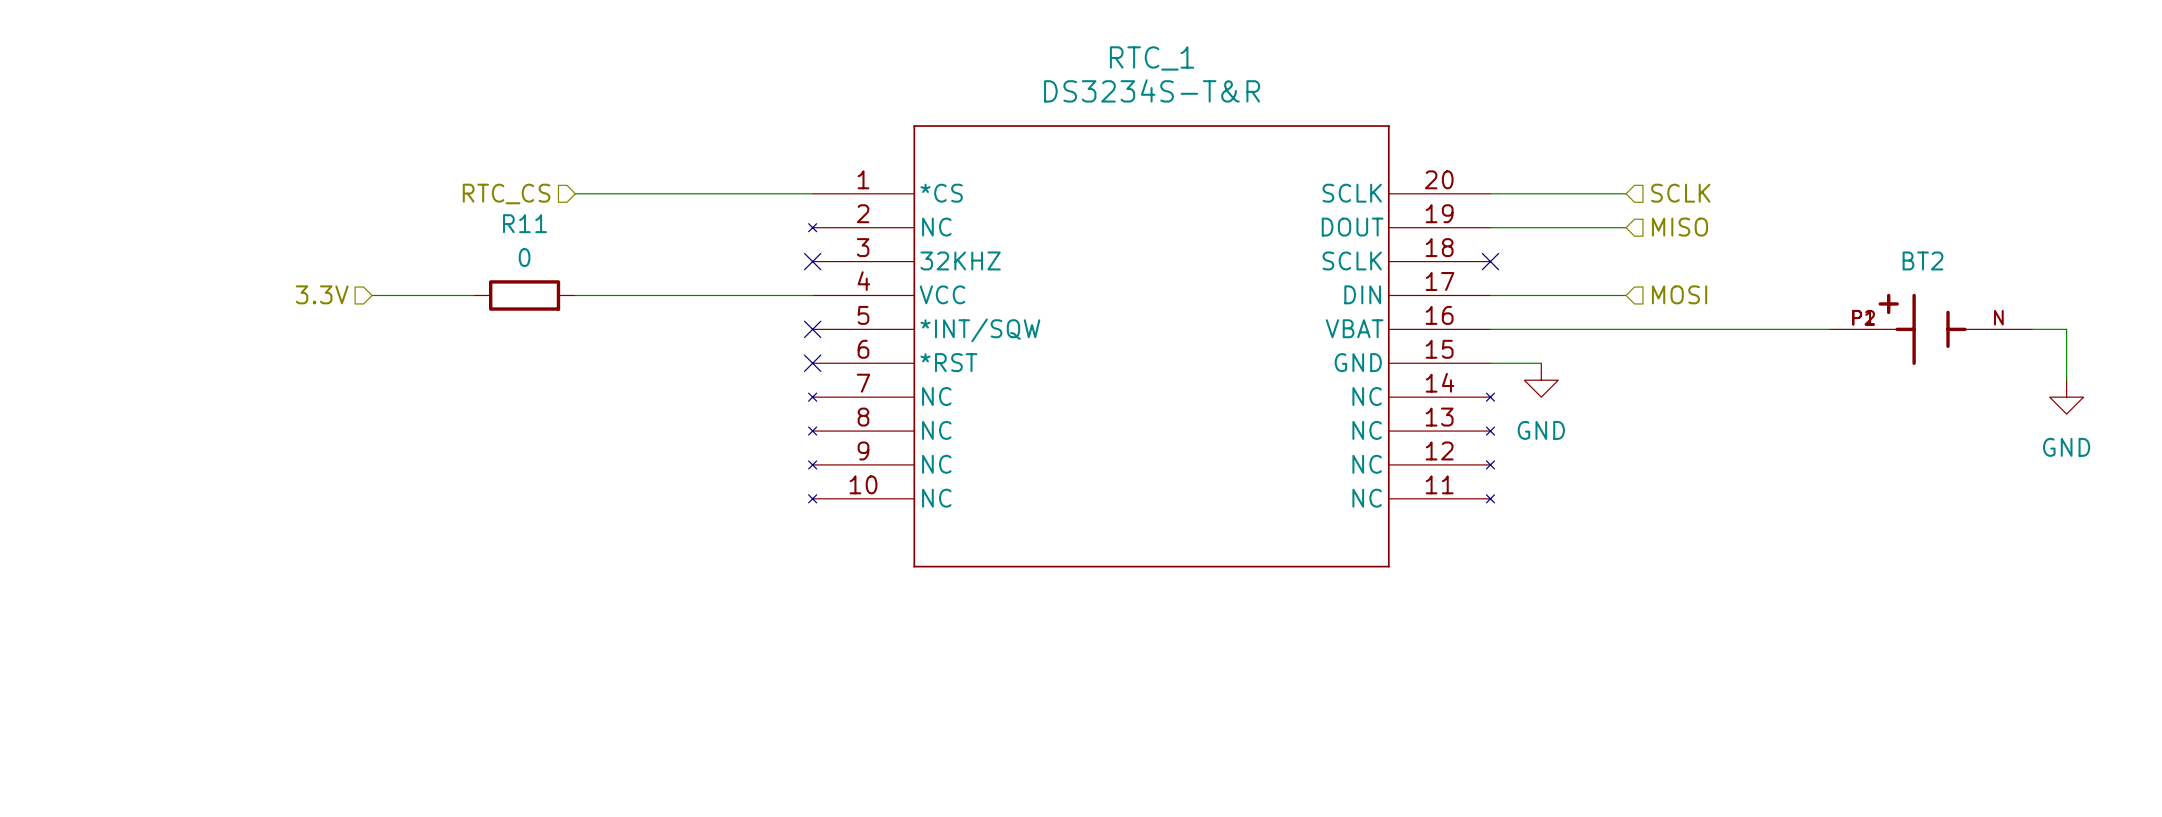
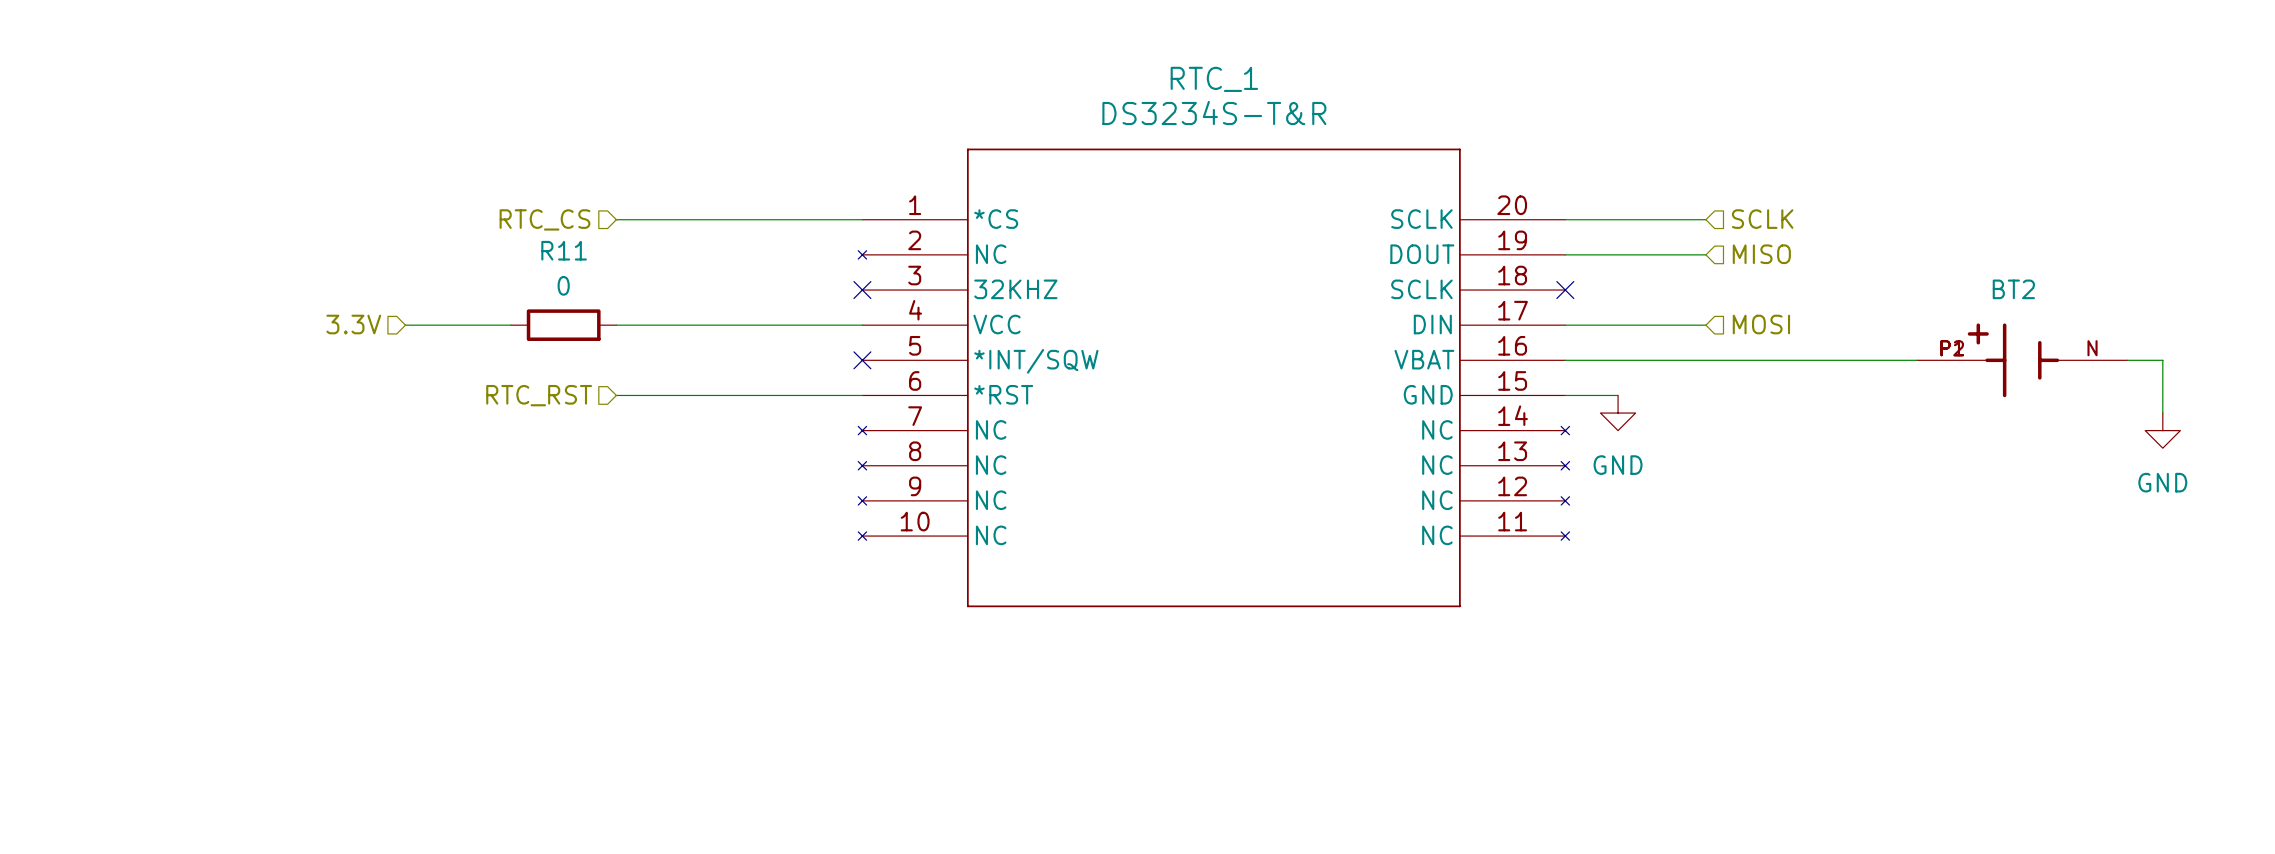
hierarchical label: none -> RTC_RST (539, 395)
wire: none -> (616, 395) (862, 395)
no-connect mark: (812, 363) -> none

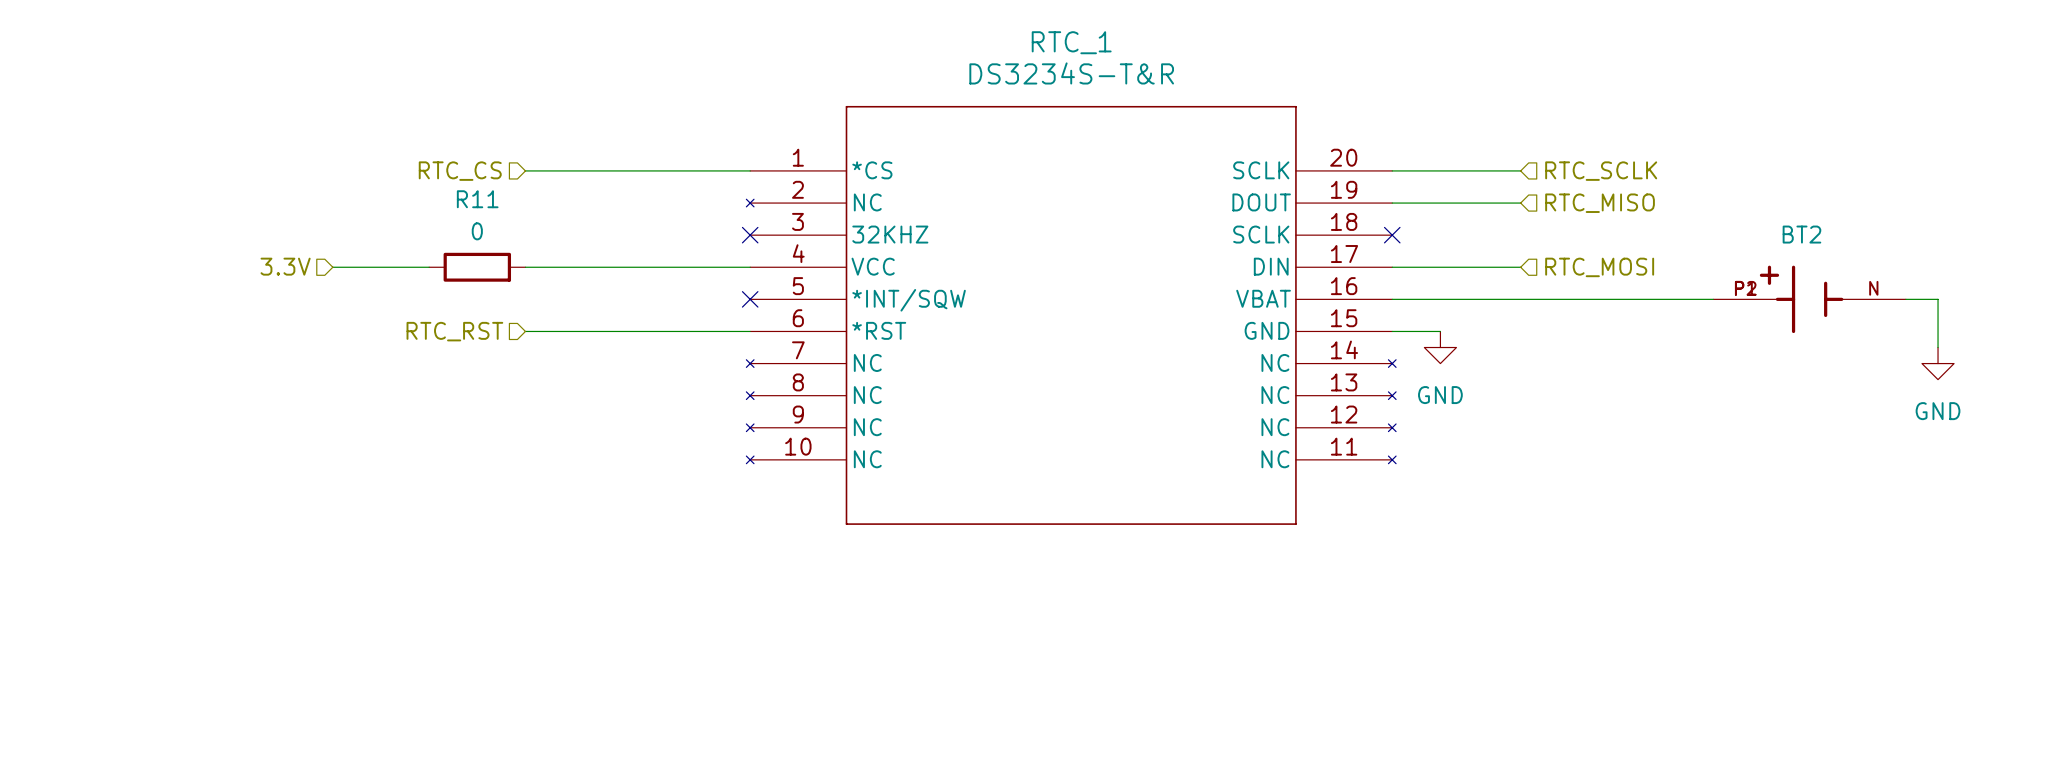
hierarchical label: SCLK (1762, 219) -> RTC_SCLK (1601, 171)
hierarchical label: MISO (1761, 254) -> RTC_MISO (1600, 203)
hierarchical label: MOSI (1761, 324) -> RTC_MOSI (1599, 267)

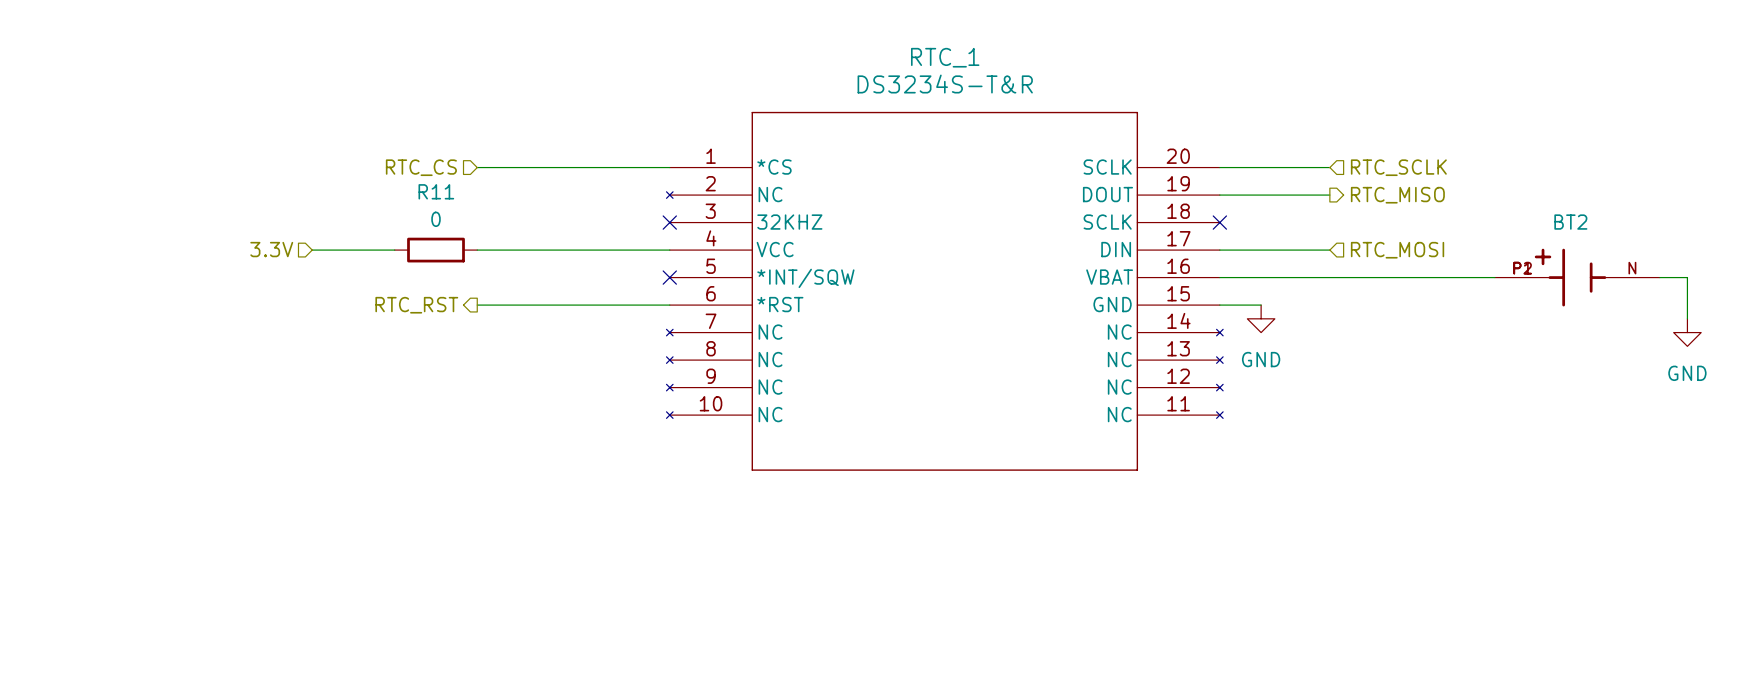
hierarchical label shape: input (1600, 203) -> output (1397, 195)
hierarchical label shape: input (454, 331) -> output (416, 305)

